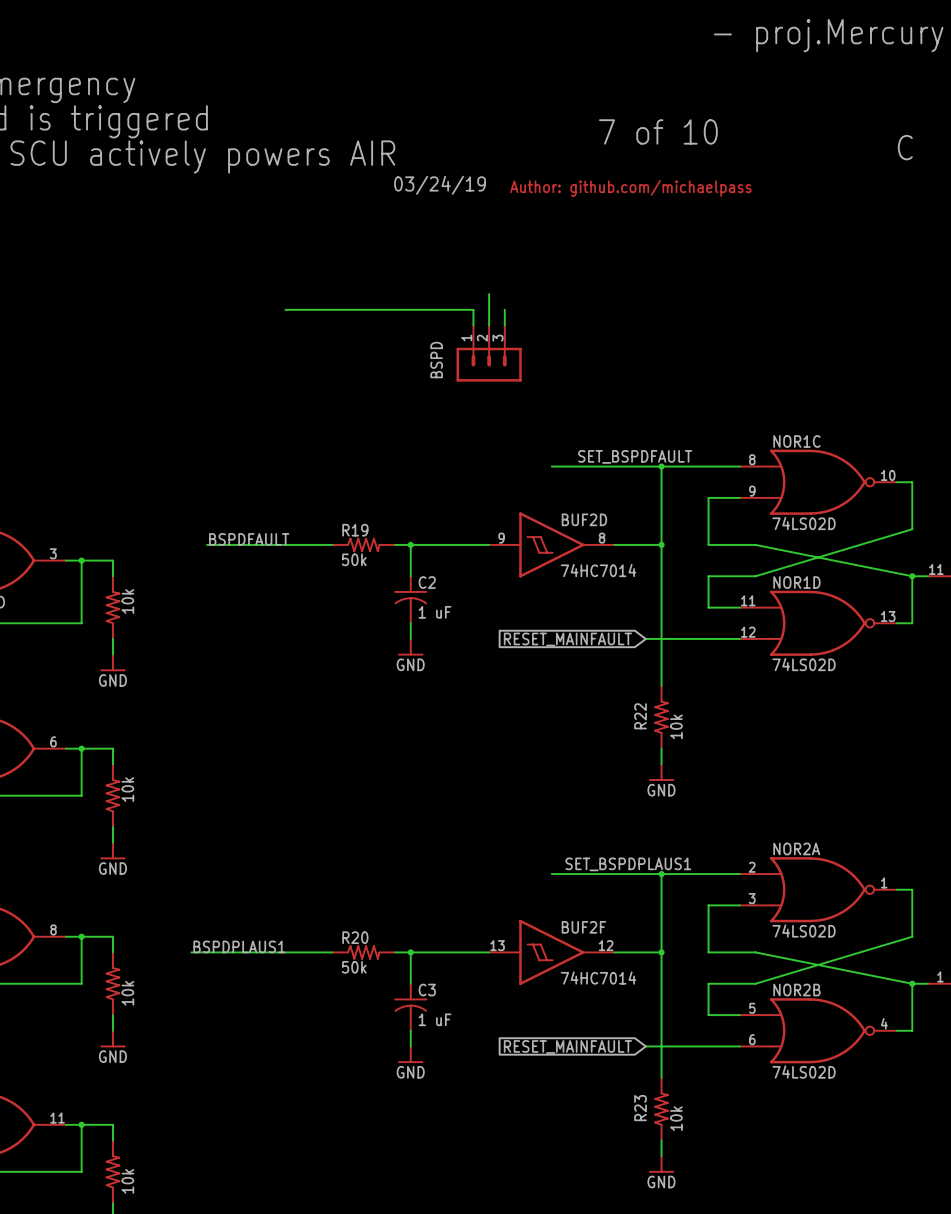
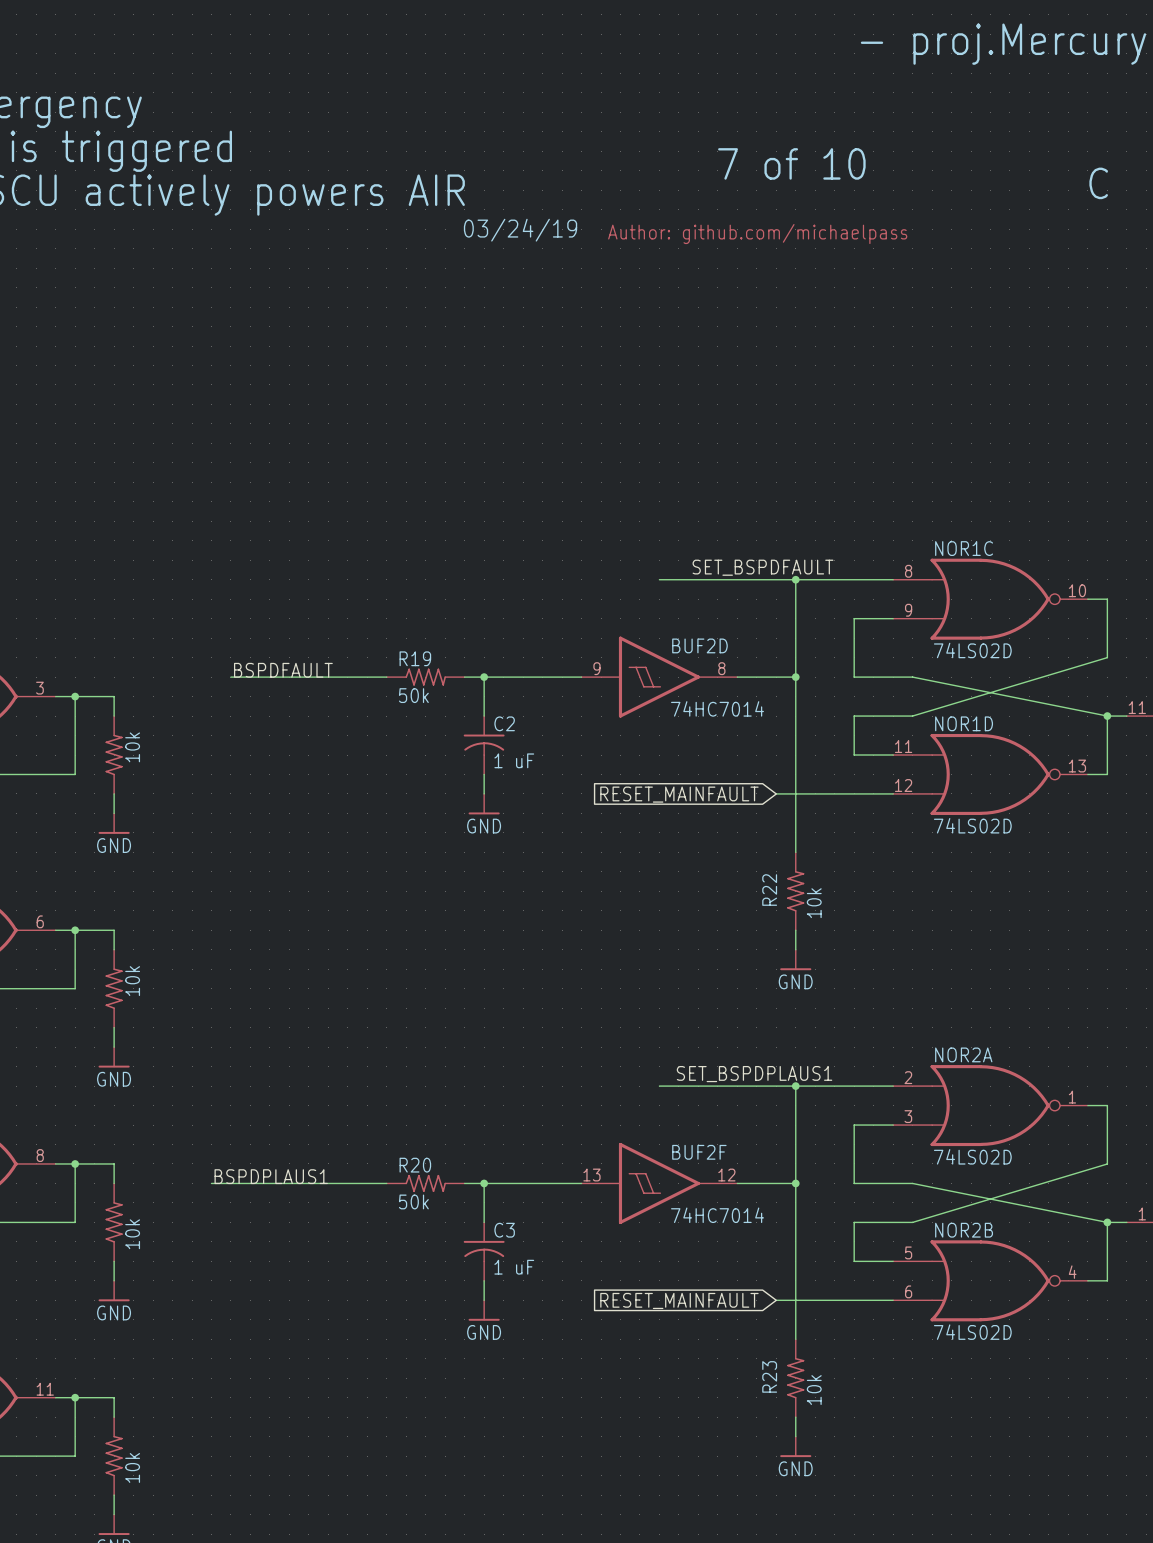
wire: (489, 294) (489, 325) -> none
wire: (285, 309) (473, 309) (473, 325) -> none
wire: (504, 309) (504, 325) -> none
BSPD: (489, 353) -> none

